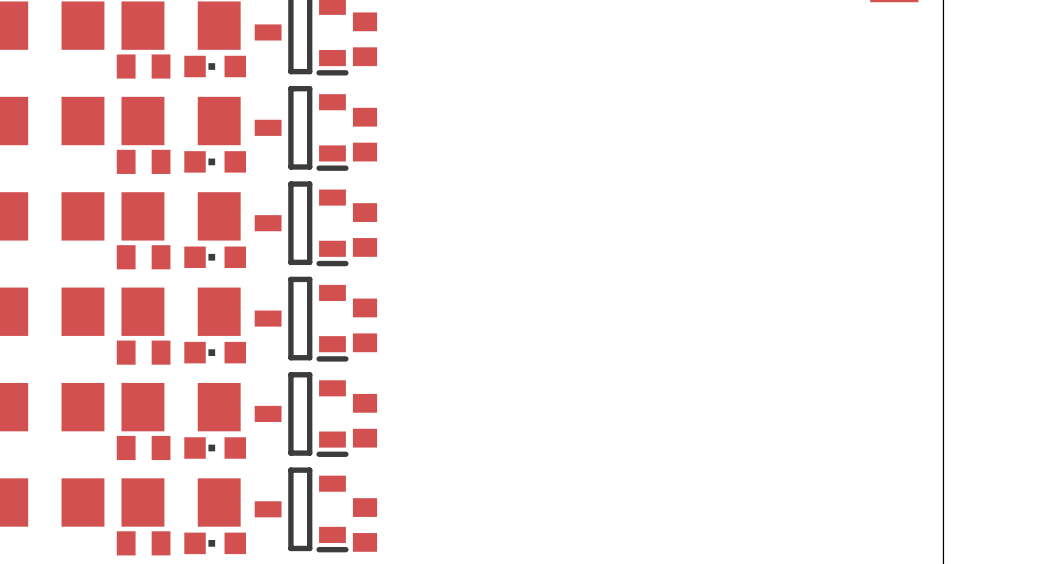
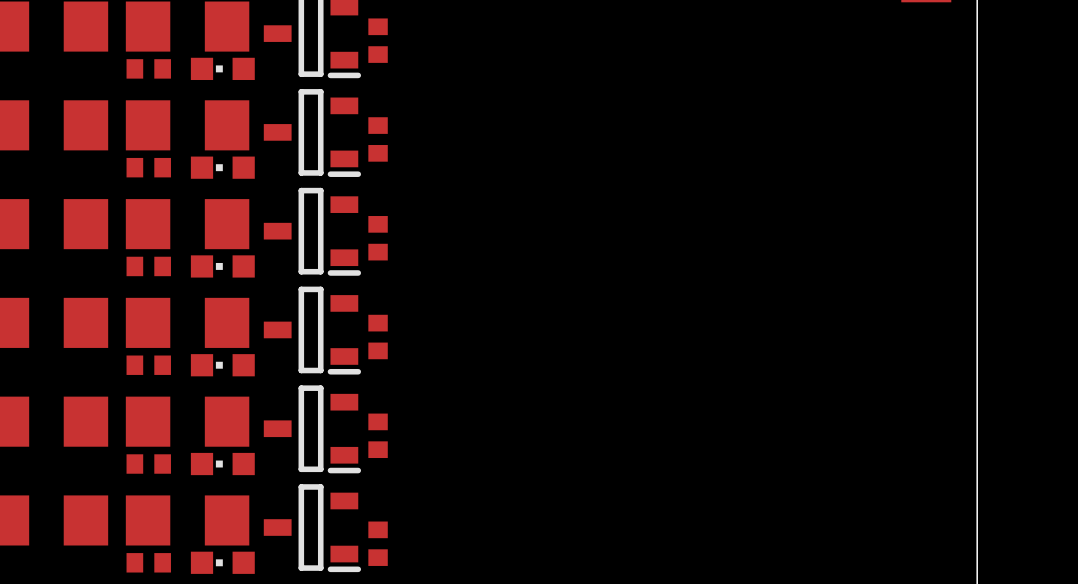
part footprint: [352, 12, 378, 67] -> [368, 18, 388, 63]
part footprint: [116, 54, 171, 79] -> [126, 59, 171, 79]
part footprint: [352, 107, 378, 162] -> [368, 117, 388, 162]
part footprint: [116, 149, 171, 174] -> [126, 157, 171, 178]
part footprint: [352, 203, 378, 257] -> [368, 216, 388, 261]
part footprint: [116, 245, 171, 270] -> [126, 256, 171, 277]
part footprint: [352, 298, 378, 353] -> [368, 314, 388, 360]
part footprint: [116, 340, 171, 365] -> [126, 355, 171, 375]
part footprint: [352, 393, 378, 448] -> [368, 413, 388, 459]
part footprint: [116, 435, 171, 461] -> [126, 454, 171, 474]
part footprint: [352, 498, 378, 552] -> [368, 521, 388, 566]
part footprint: [116, 531, 171, 556] -> [126, 553, 171, 573]

